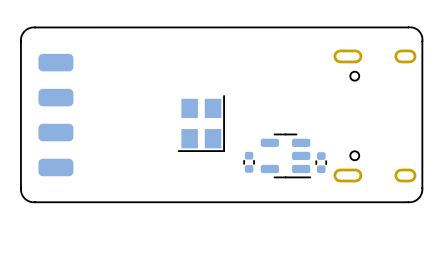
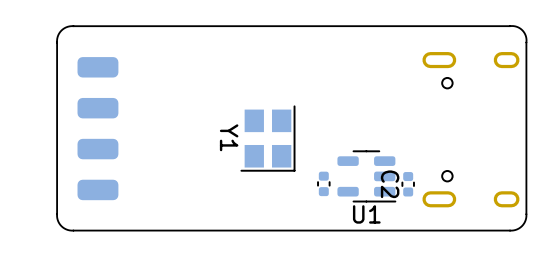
Y1 name: none -> Y1 (229, 137)
C2 name: none -> C2 (390, 184)
U1 name: none -> U1 (366, 214)

